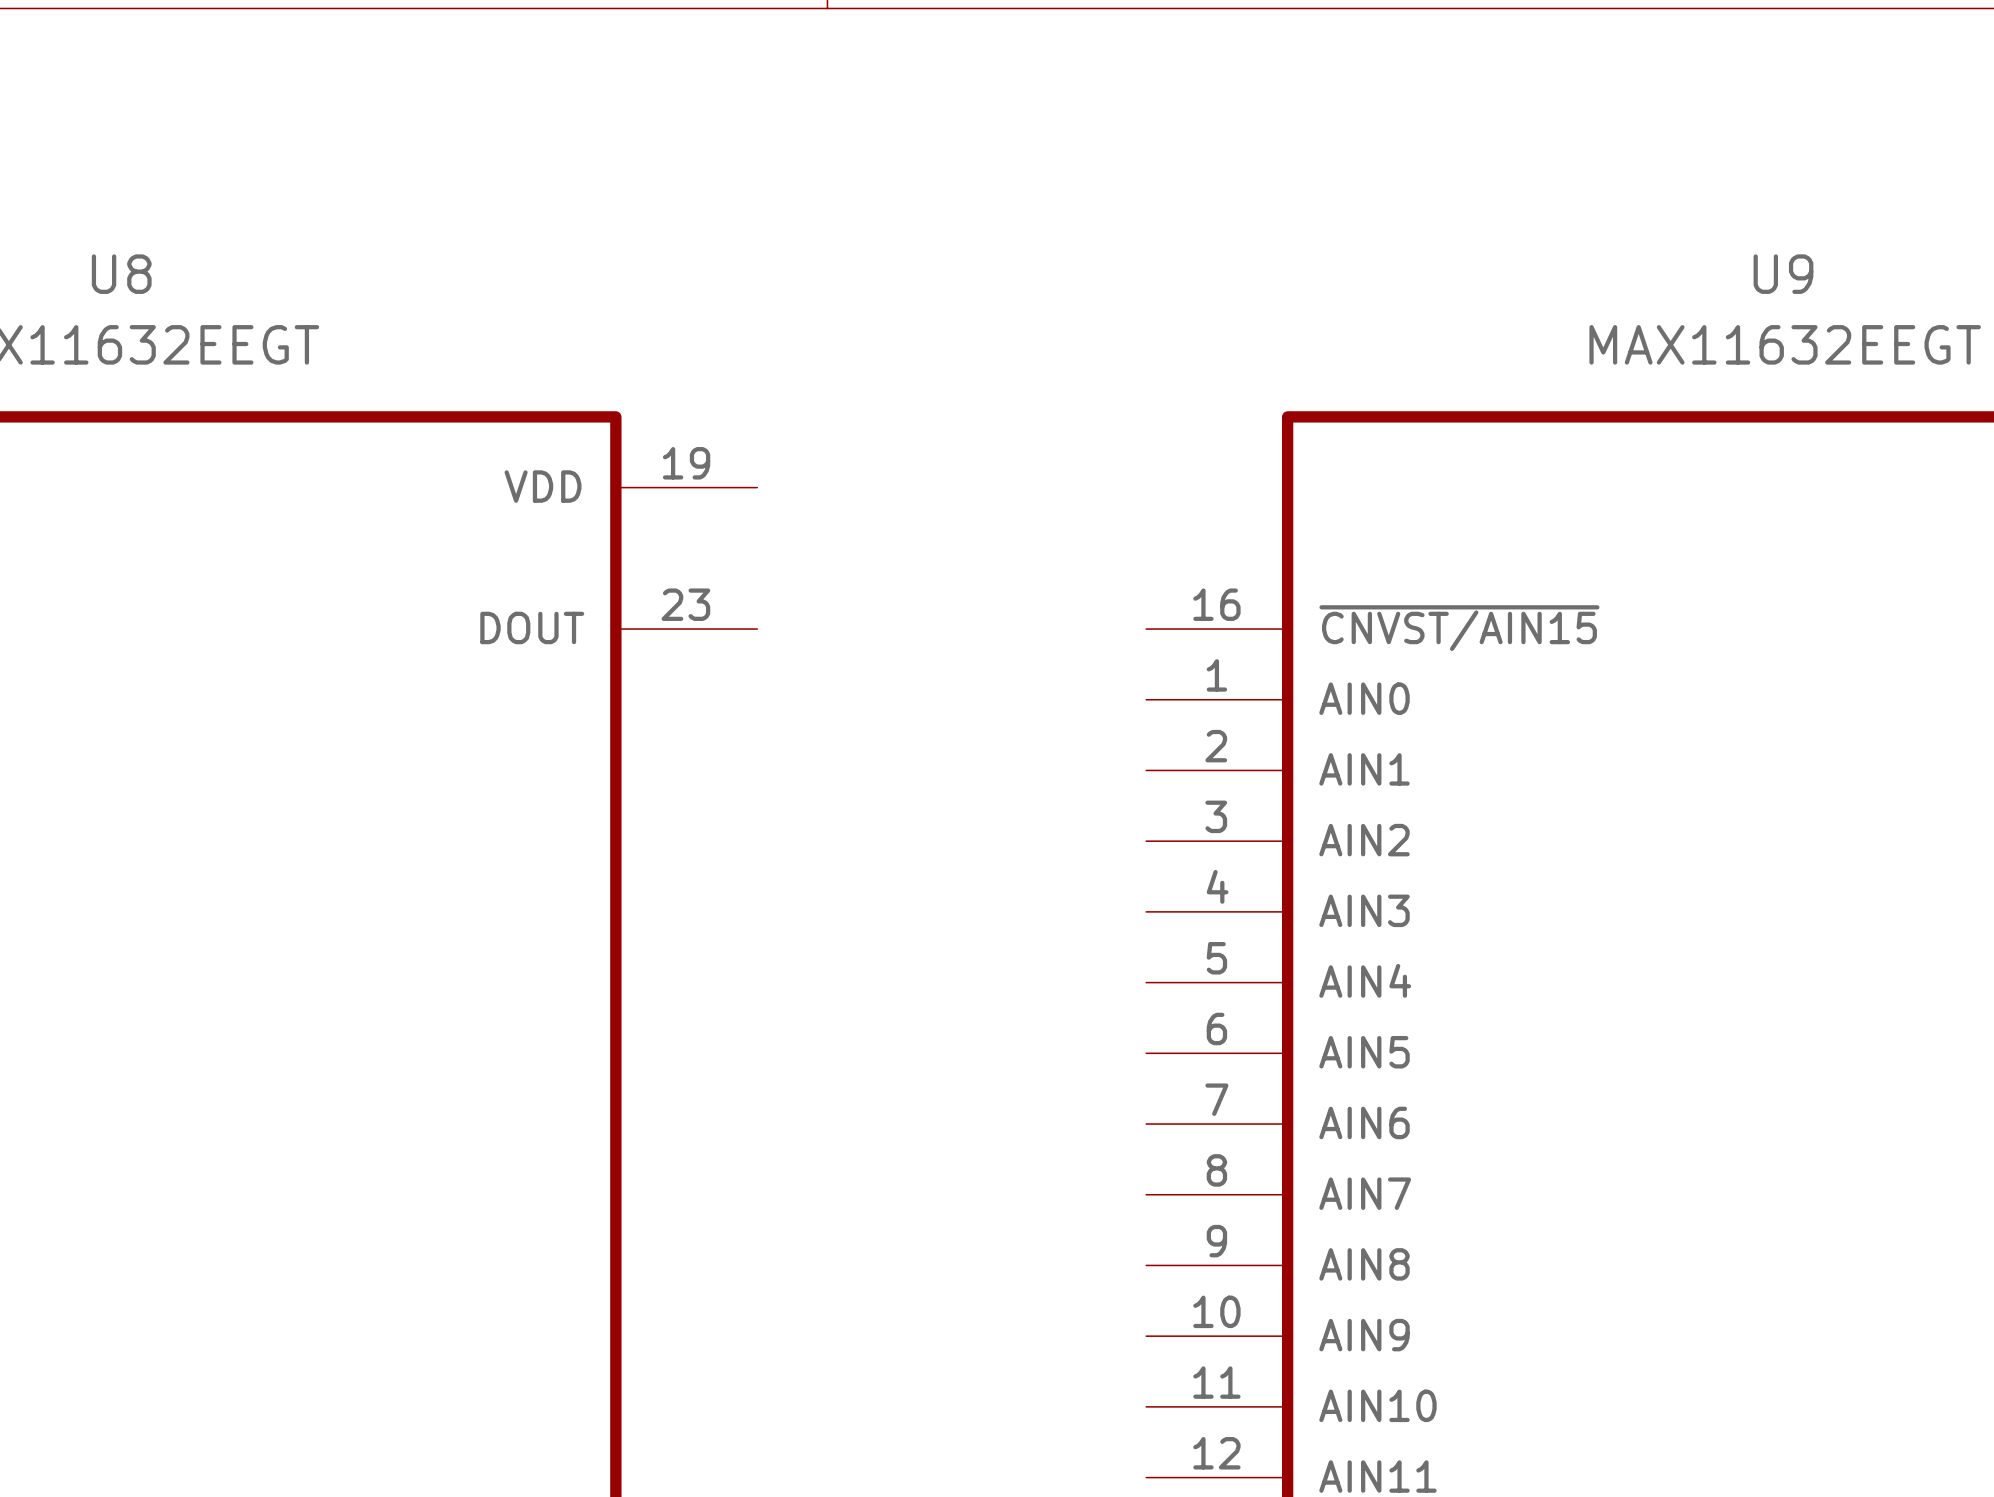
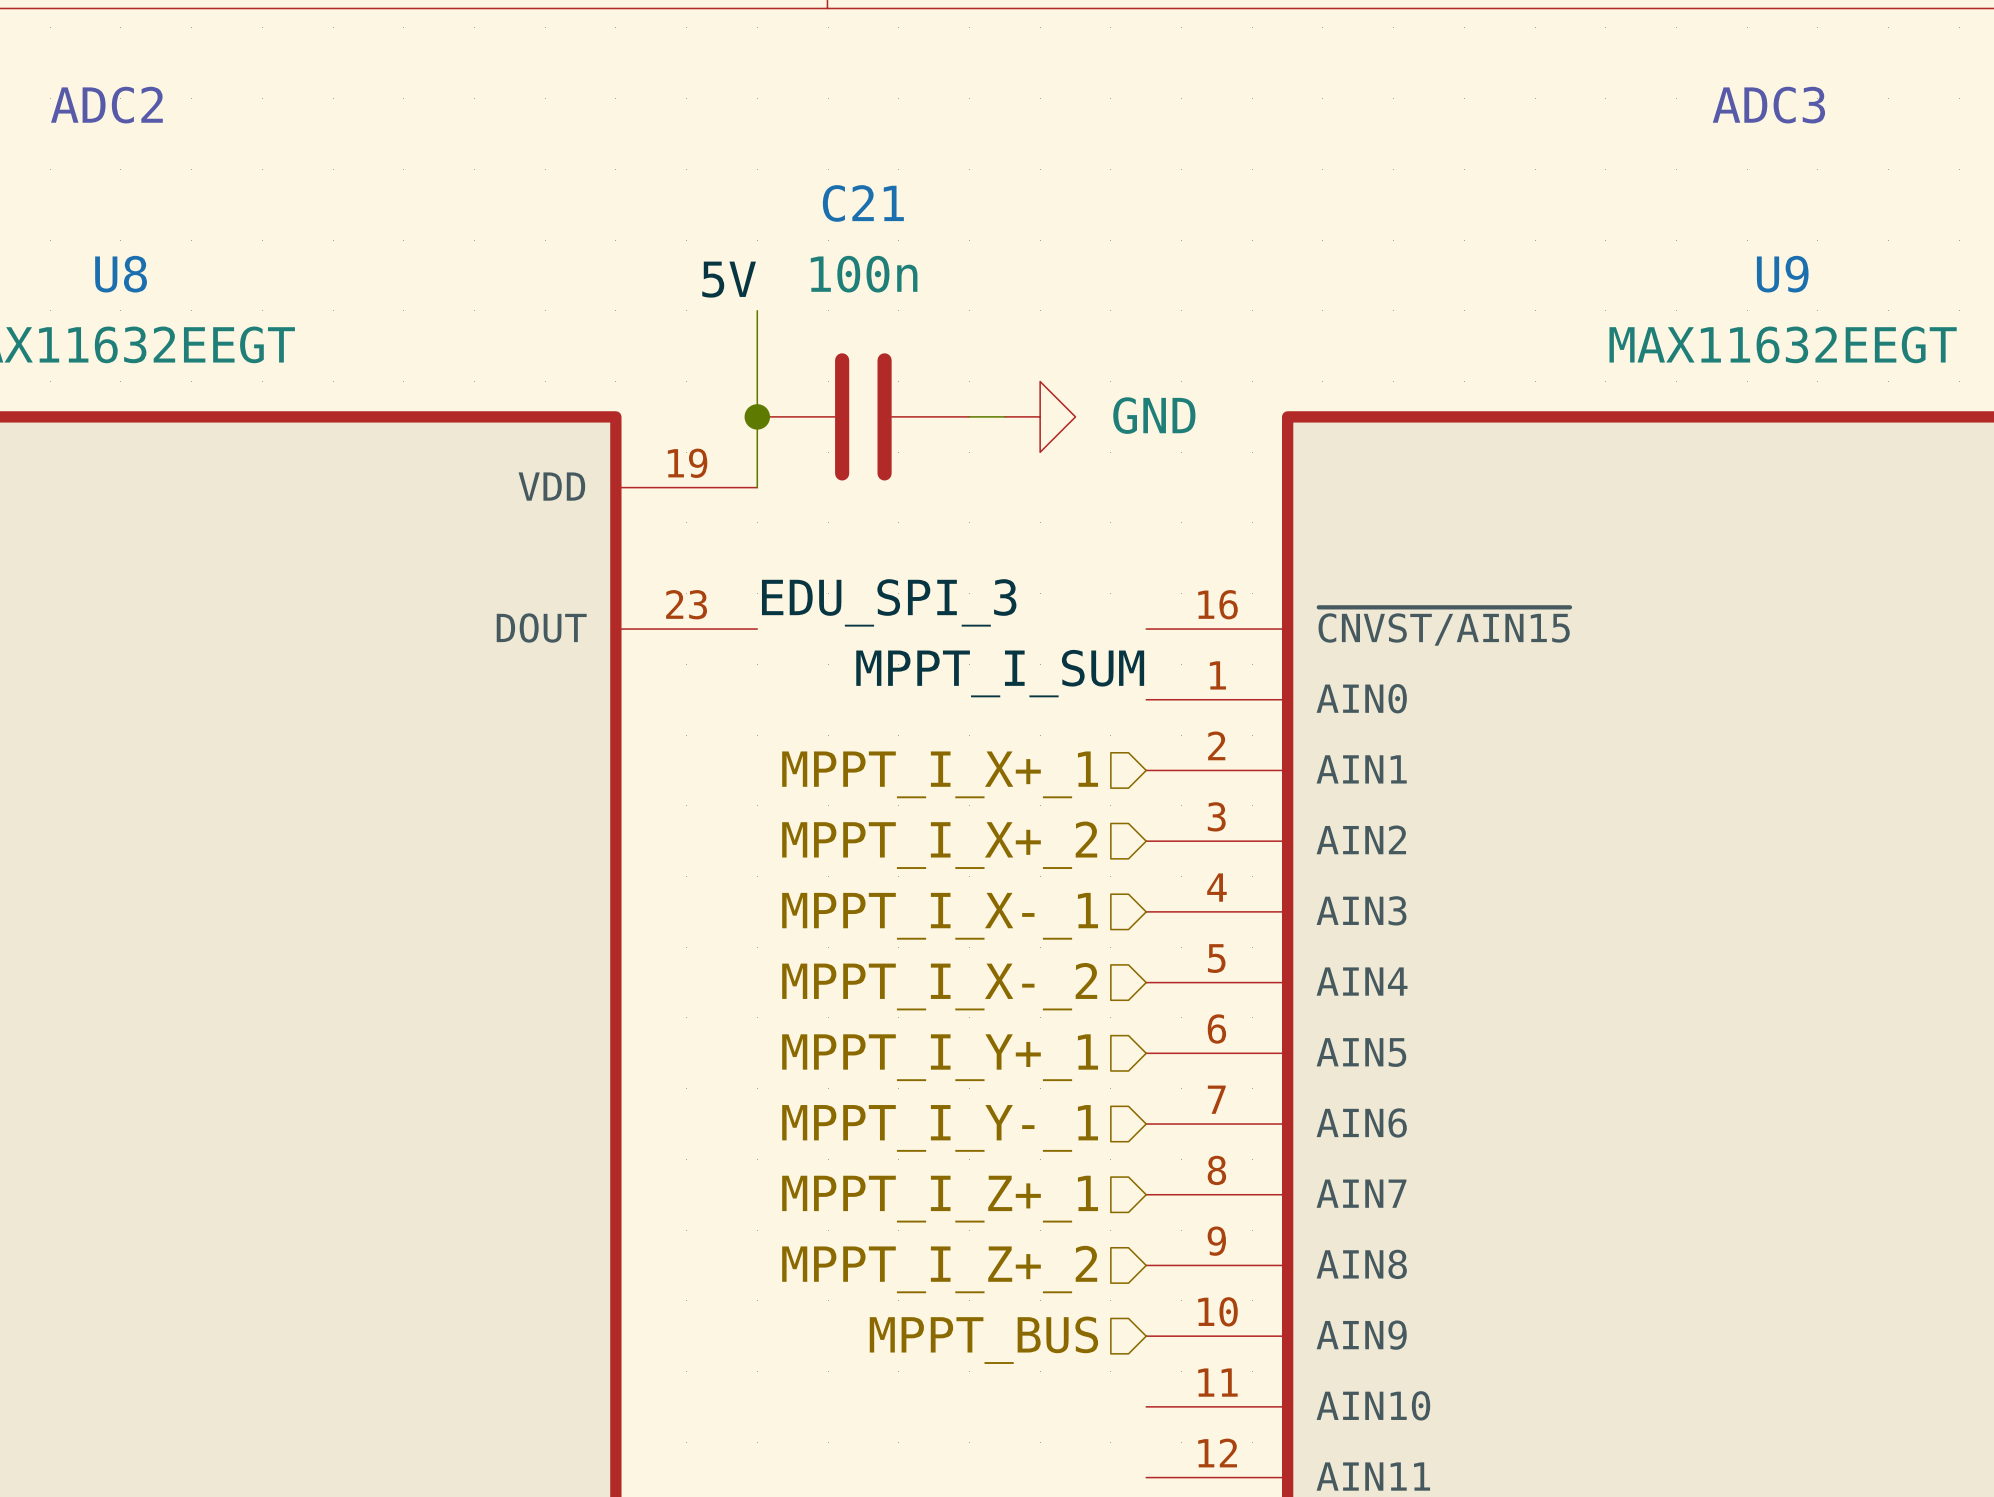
text: none -> ADC2 (106, 105)
text: none -> ADC3 (1768, 105)
label: none -> 5V (729, 279)
wire: none -> (757, 310) (757, 487)
junction: none -> (757, 416)
C21: none -> 100n (863, 416)
wire: none -> (969, 416) (1004, 416)
power symbol: none -> GND (1040, 416)
label: none -> EDU_SPI_3 (889, 602)
label: none -> MPPT_I_SUM (1000, 673)
hierarchical label: none -> MPPT_I_X+_1 (940, 774)
hierarchical label: none -> MPPT_I_X+_2 (939, 845)
hierarchical label: none -> MPPT_I_X-_1 (940, 916)
hierarchical label: none -> MPPT_I_X-_2 (939, 986)
hierarchical label: none -> MPPT_I_Y+_1 (940, 1057)
hierarchical label: none -> MPPT_I_Y-_1 (940, 1128)
hierarchical label: none -> MPPT_I_Z+_1 (940, 1199)
hierarchical label: none -> MPPT_I_Z+_2 (939, 1269)
hierarchical label: none -> MPPT_BUS (983, 1340)

